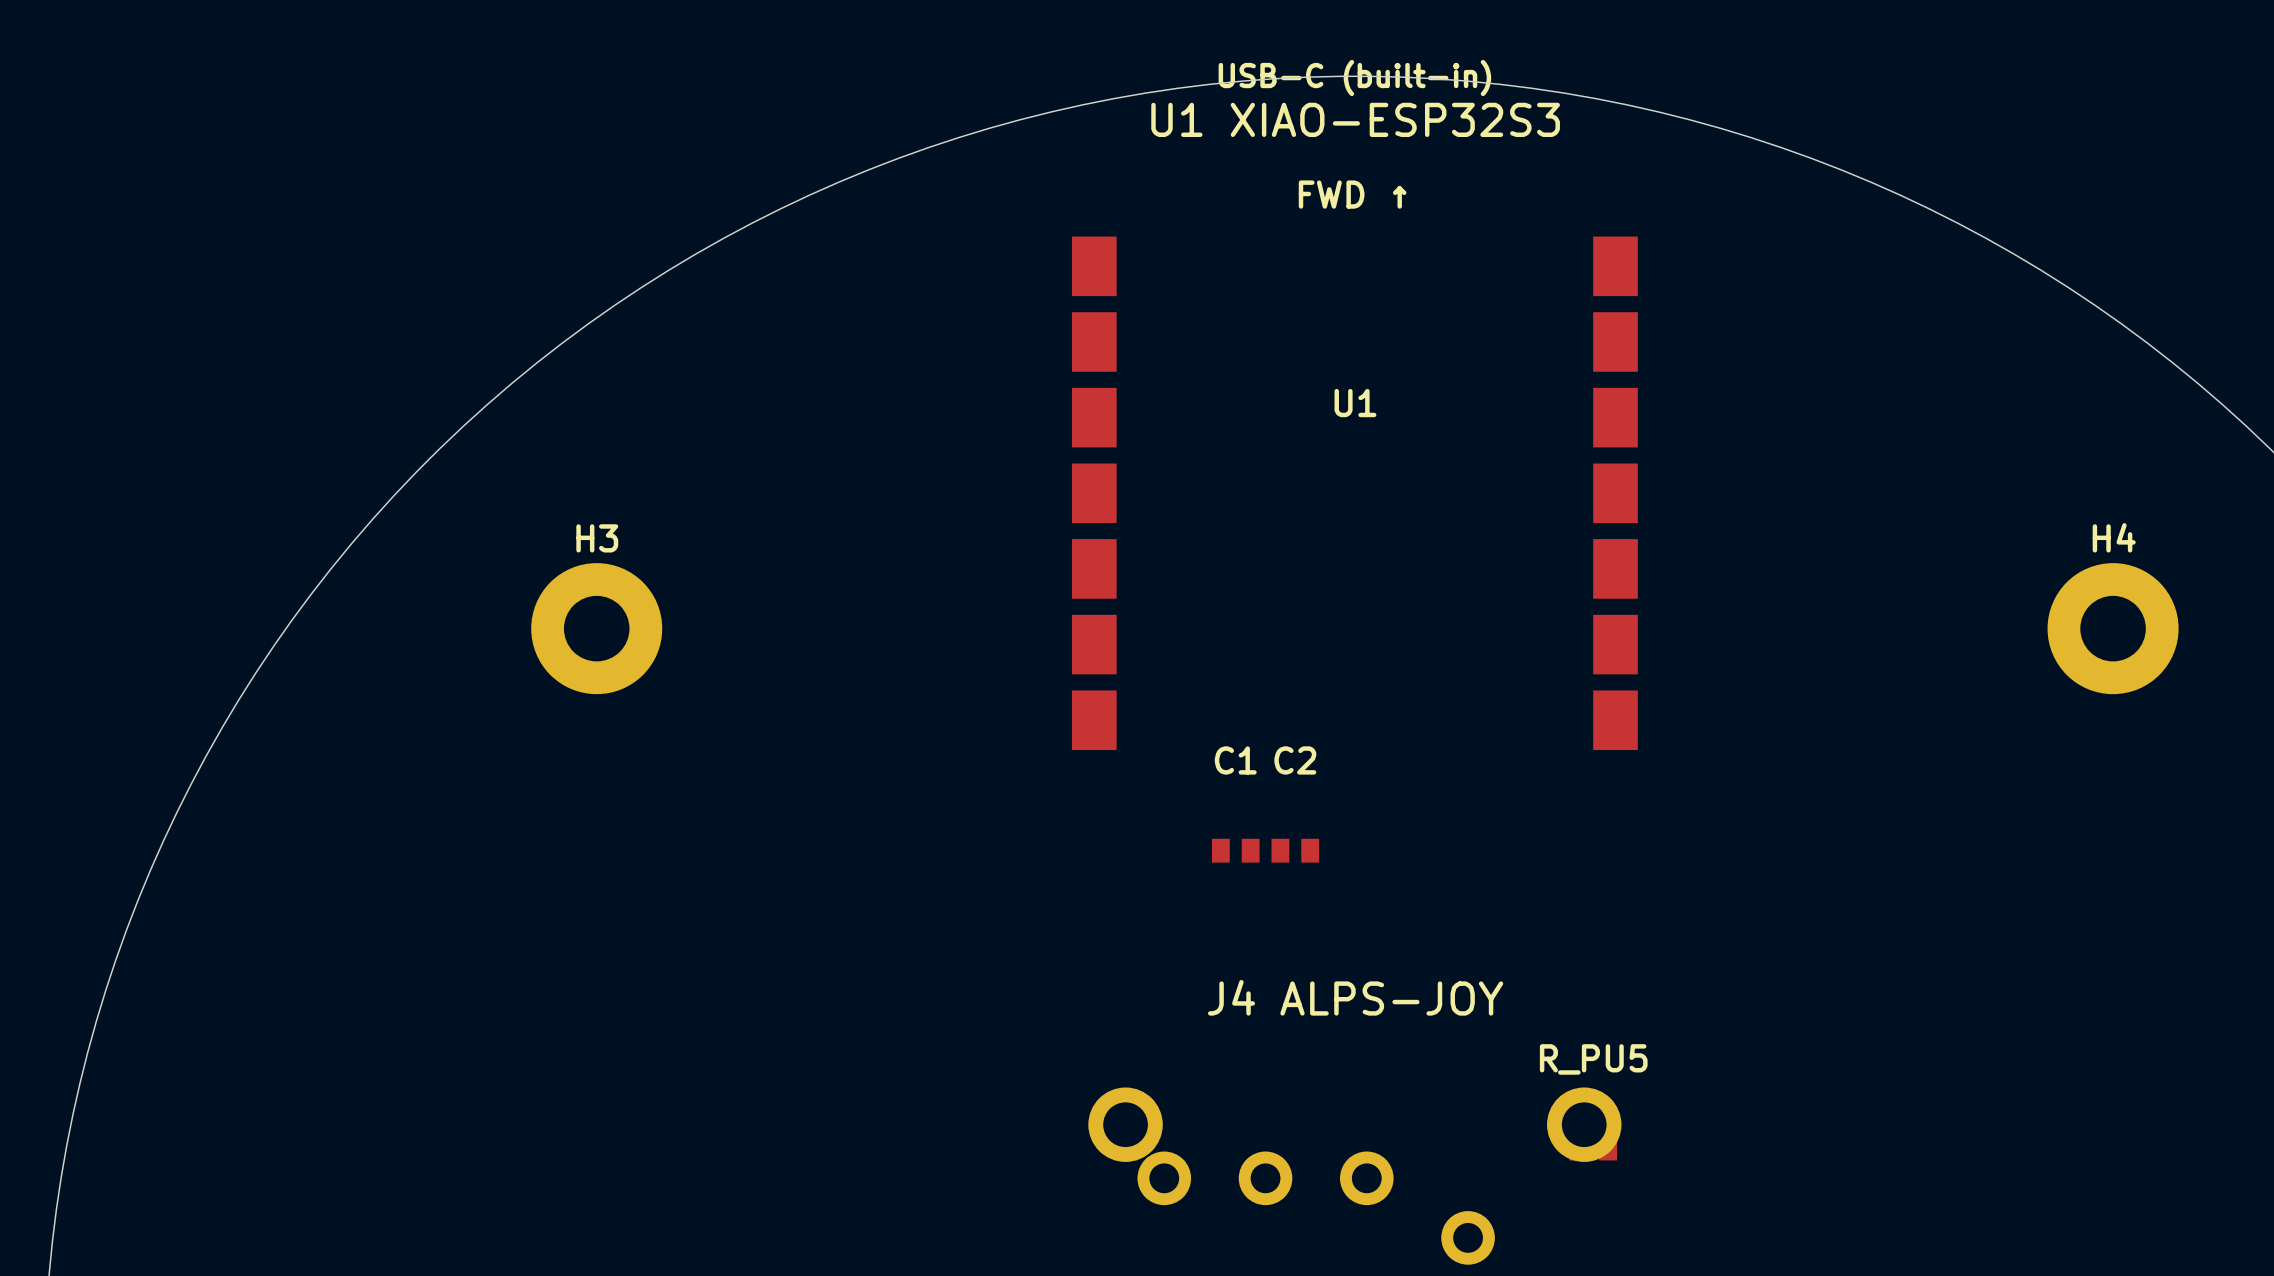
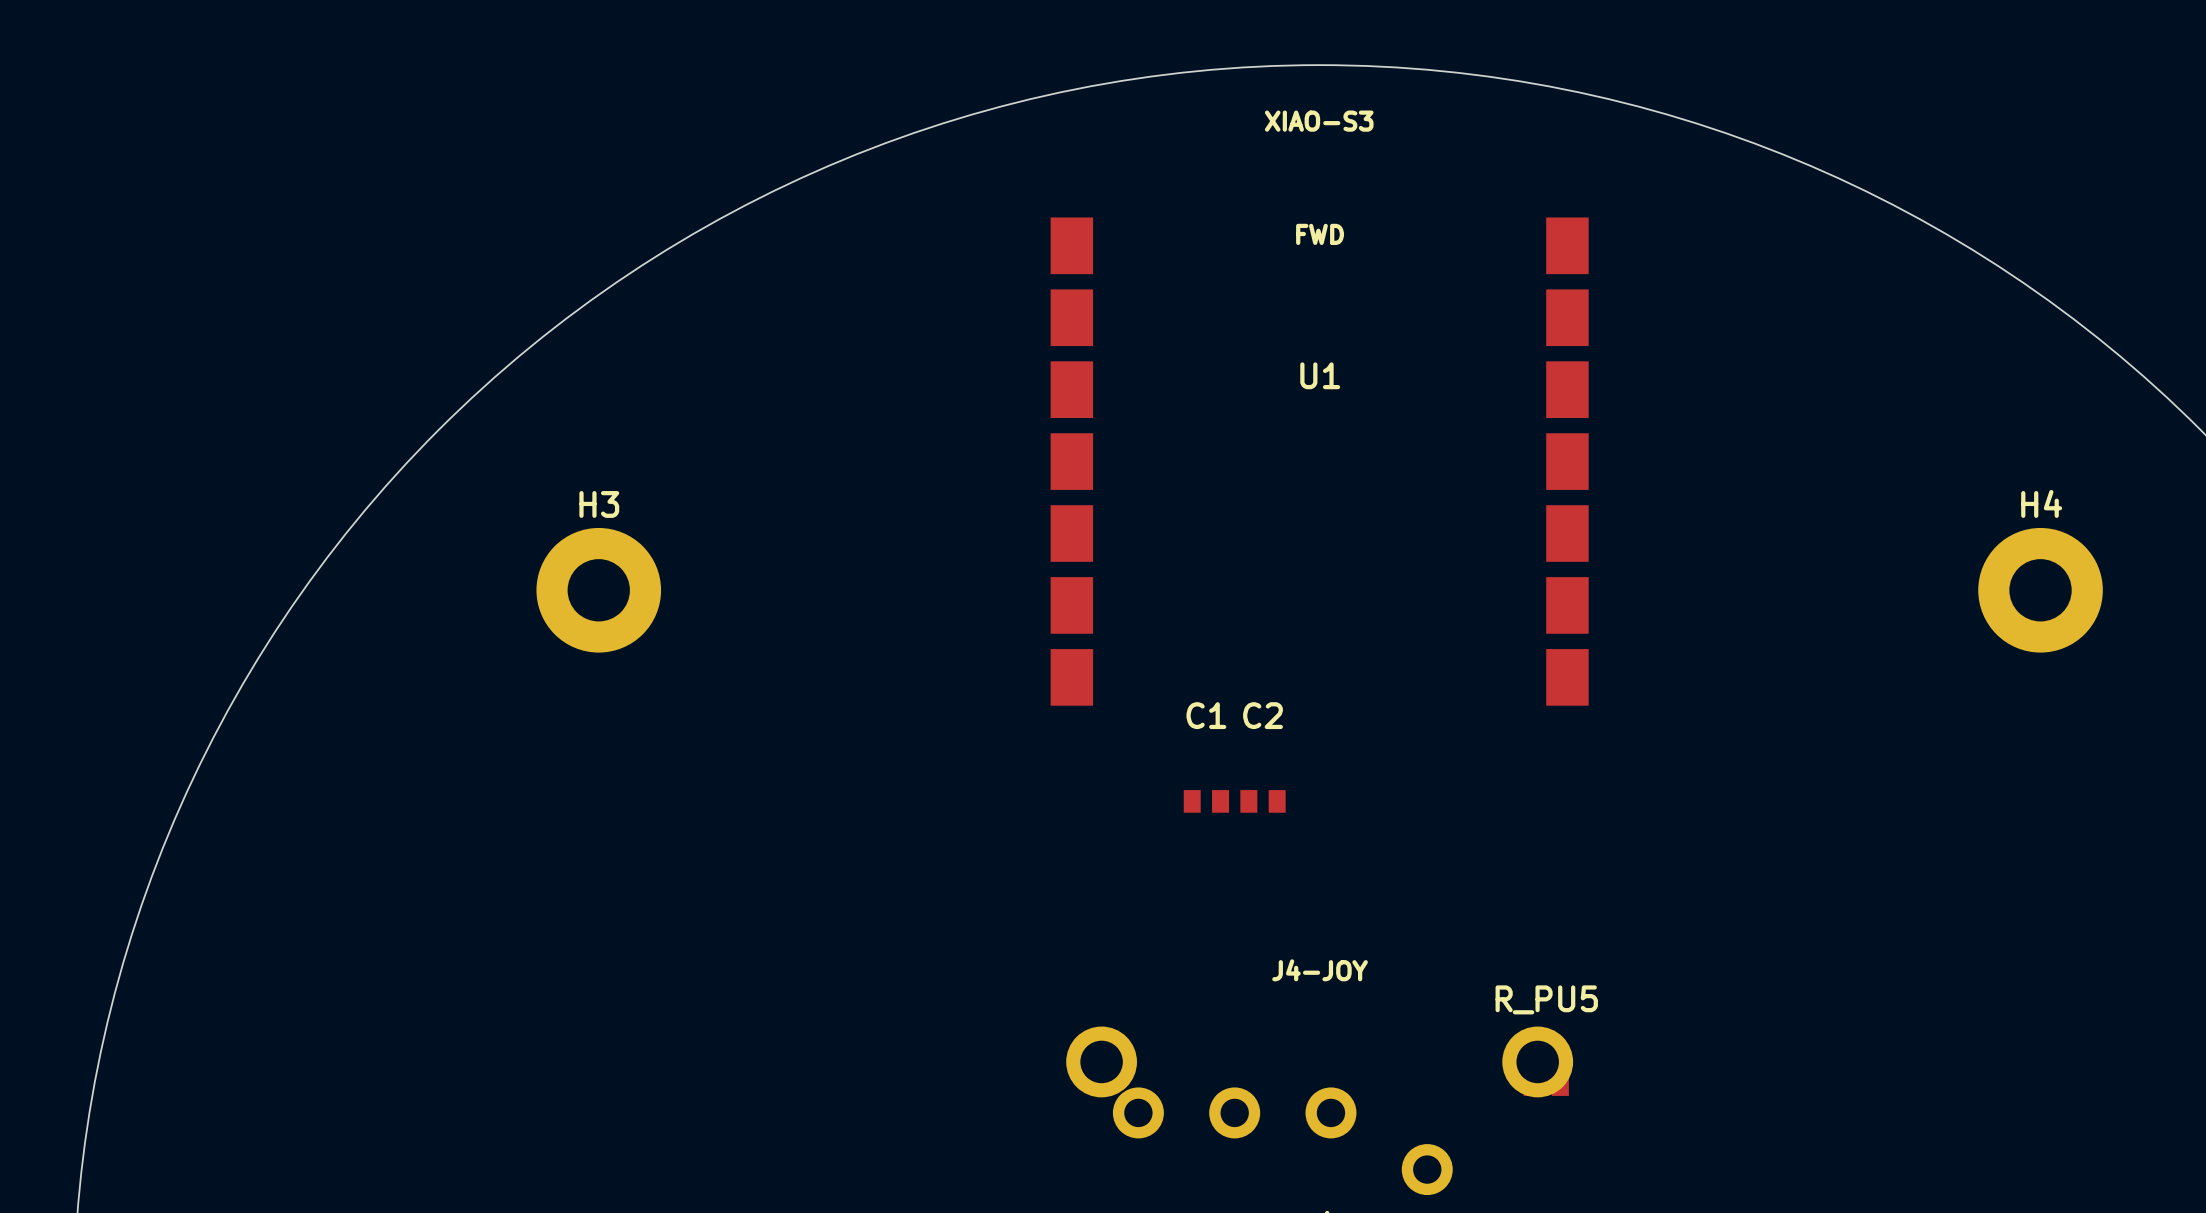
text: USB-C (built-in) (1354, 78) -> none
text: U1 XIAO-ESP32S3 (1355, 119) -> XIAO-S3 (1319, 121)
text: FWD ↑ (1352, 194) -> none
text: none -> FWD (1320, 234)
text: J4 ALPS-JOY (1355, 997) -> J4-JOY (1320, 970)

